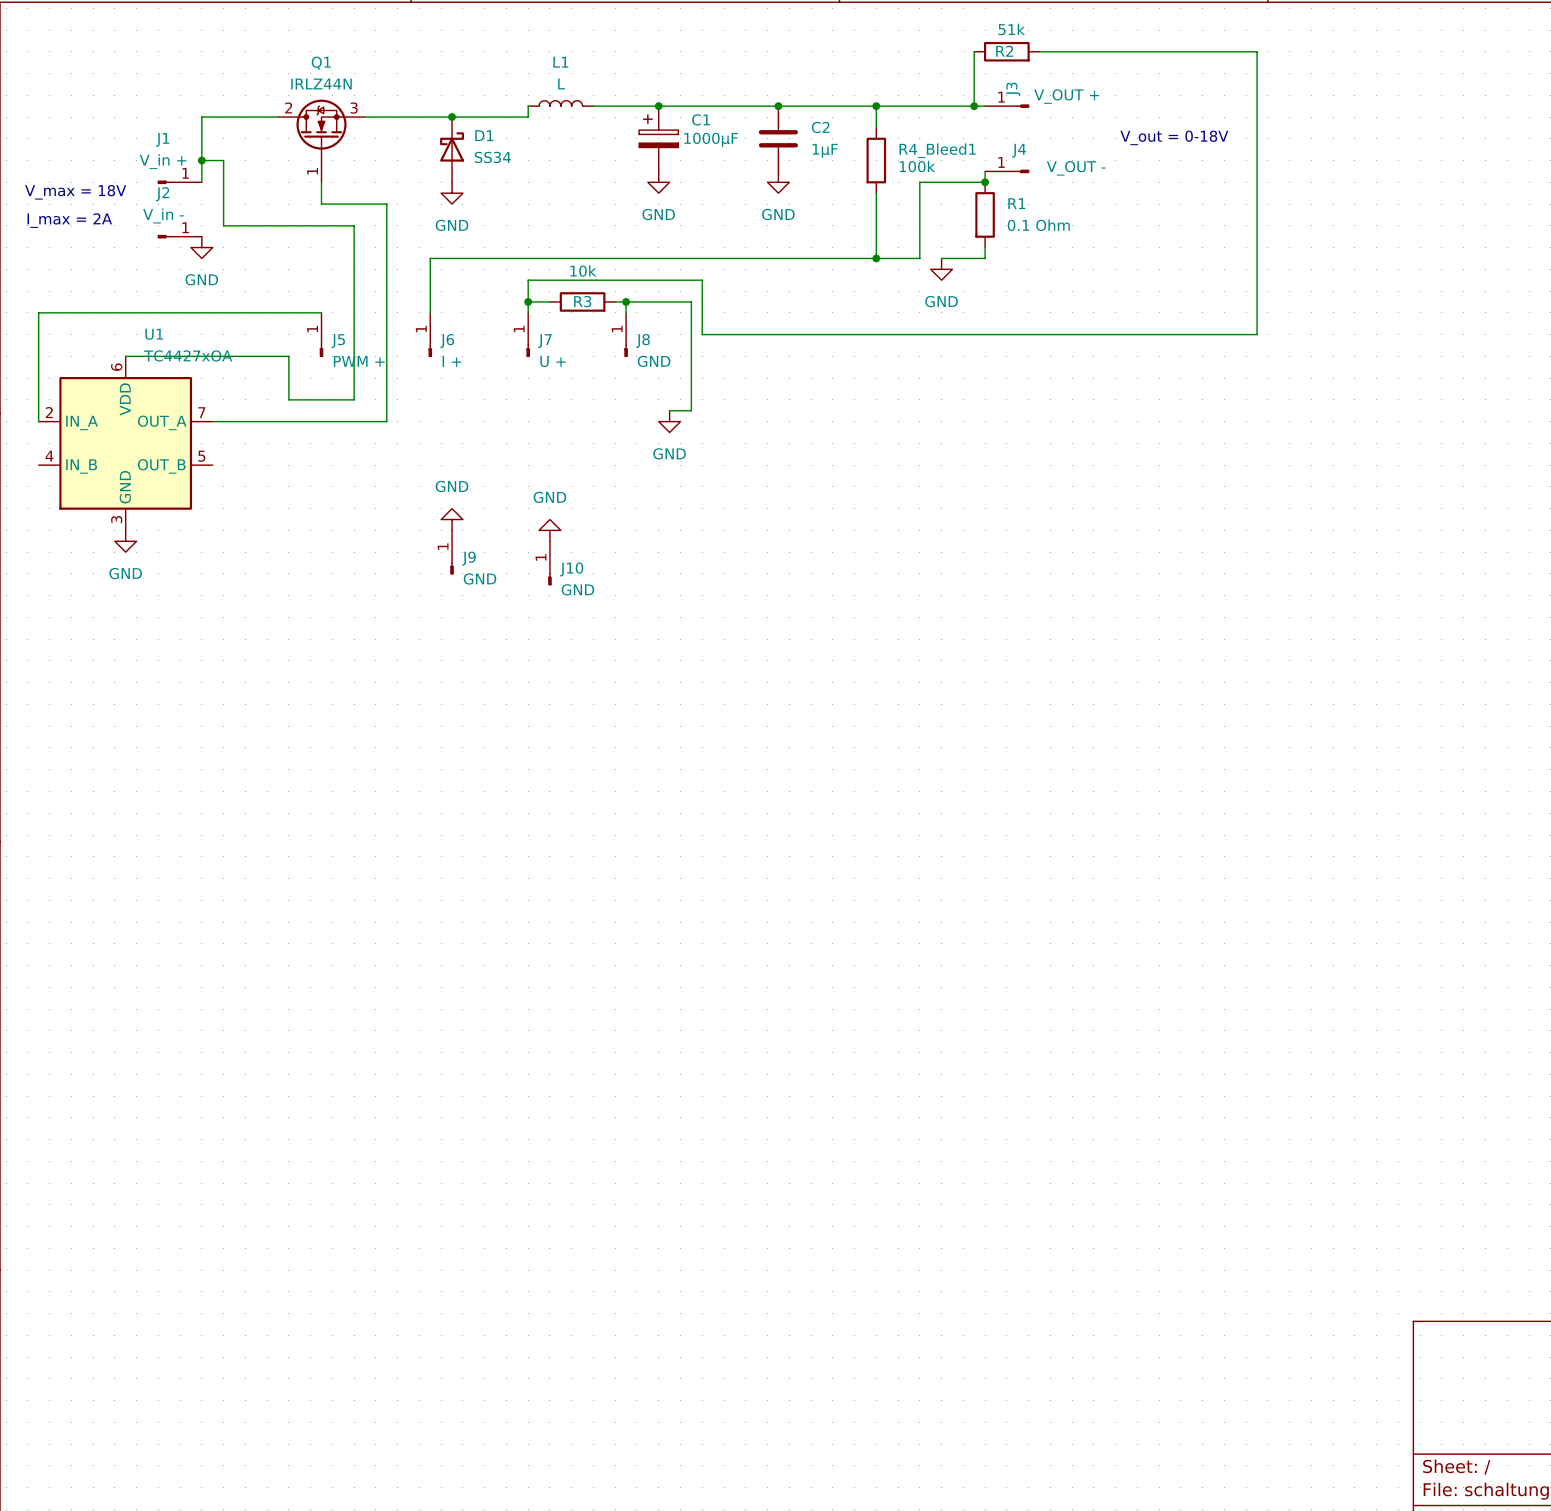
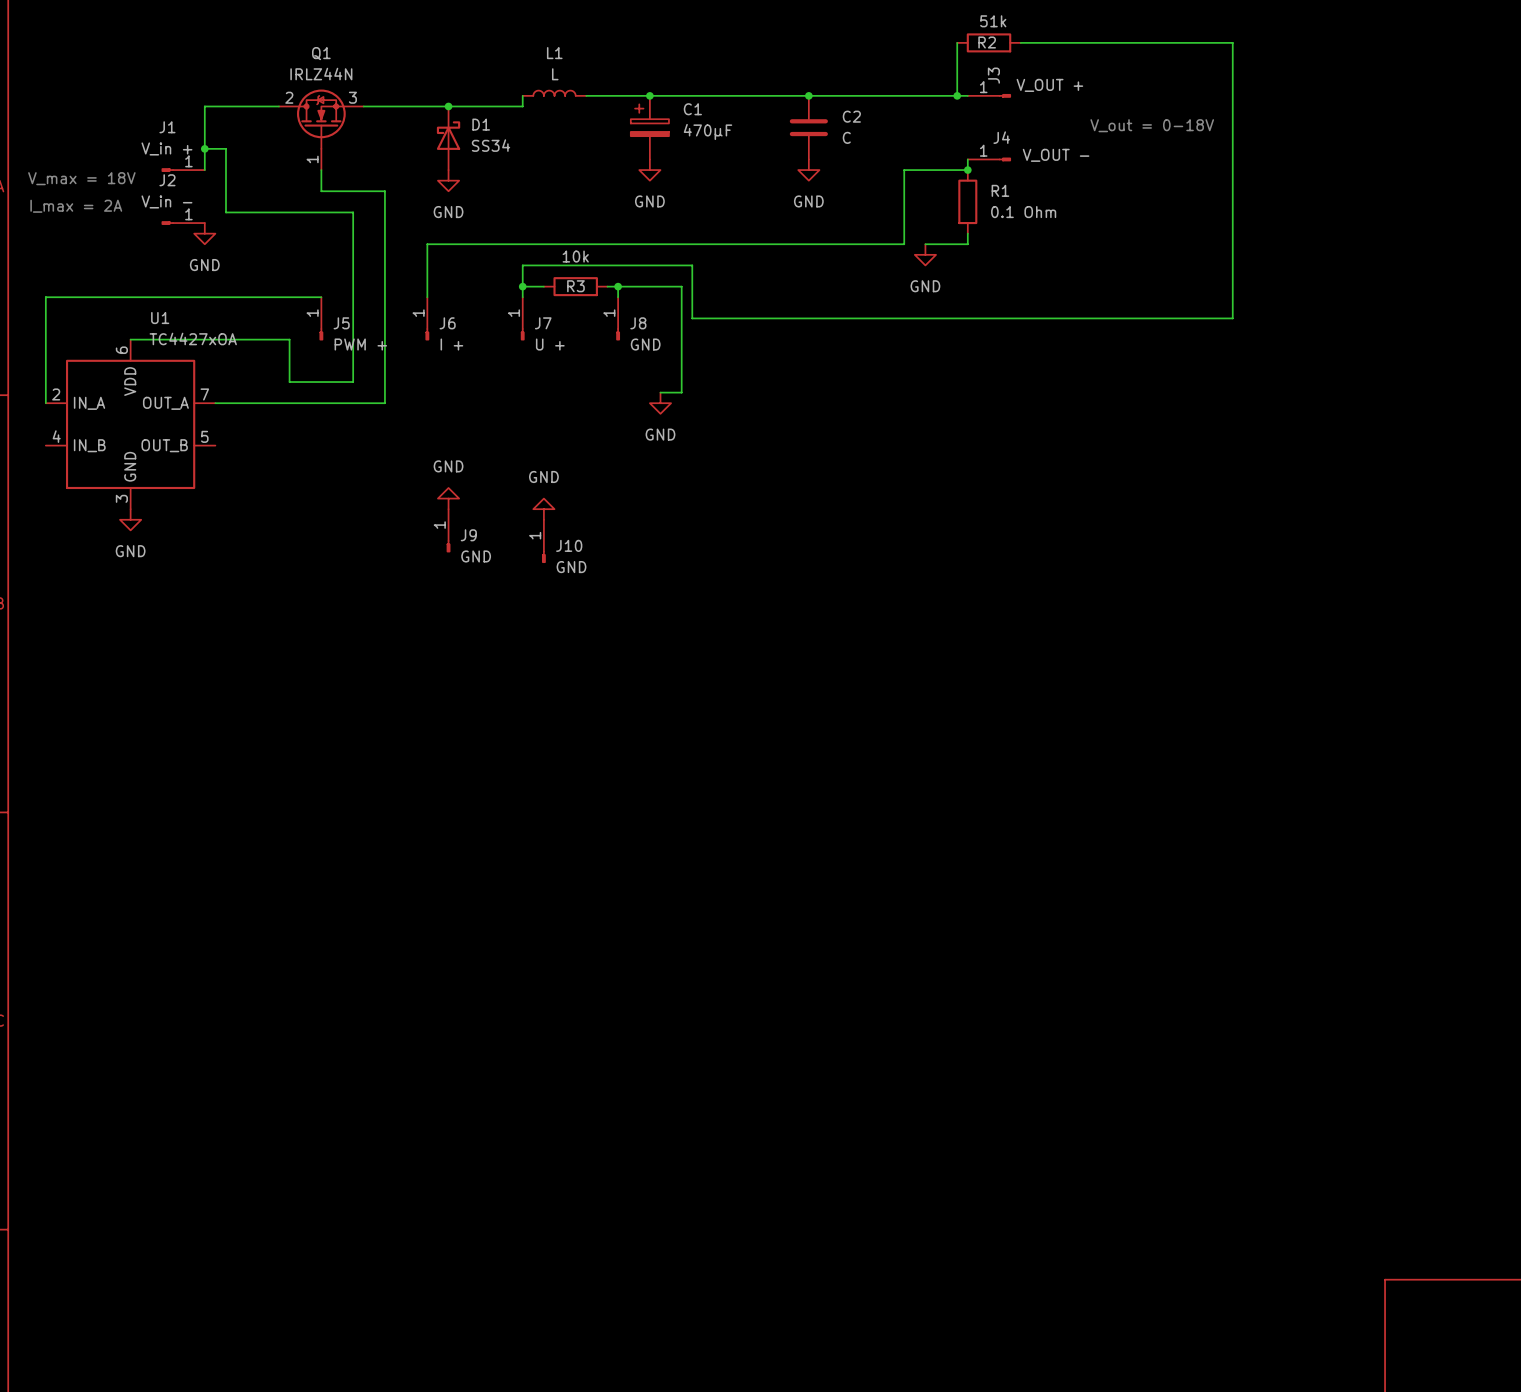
junction: (778, 106) -> none
junction: none -> (808, 95)
wire: (876, 106) (876, 127) -> none
junction: (876, 106) -> none
C2 position: (778, 138) -> (808, 127)
C1 value: 1000µF (711, 139) -> 470µF (708, 131)
C2 value: 1µF (825, 150) -> C (846, 137)
R4_Bleed1: 100k (876, 160) -> none
power symbol position: GND (778, 182) -> GND (808, 170)
wire: (876, 193) (876, 258) -> none
junction: (876, 258) -> none

